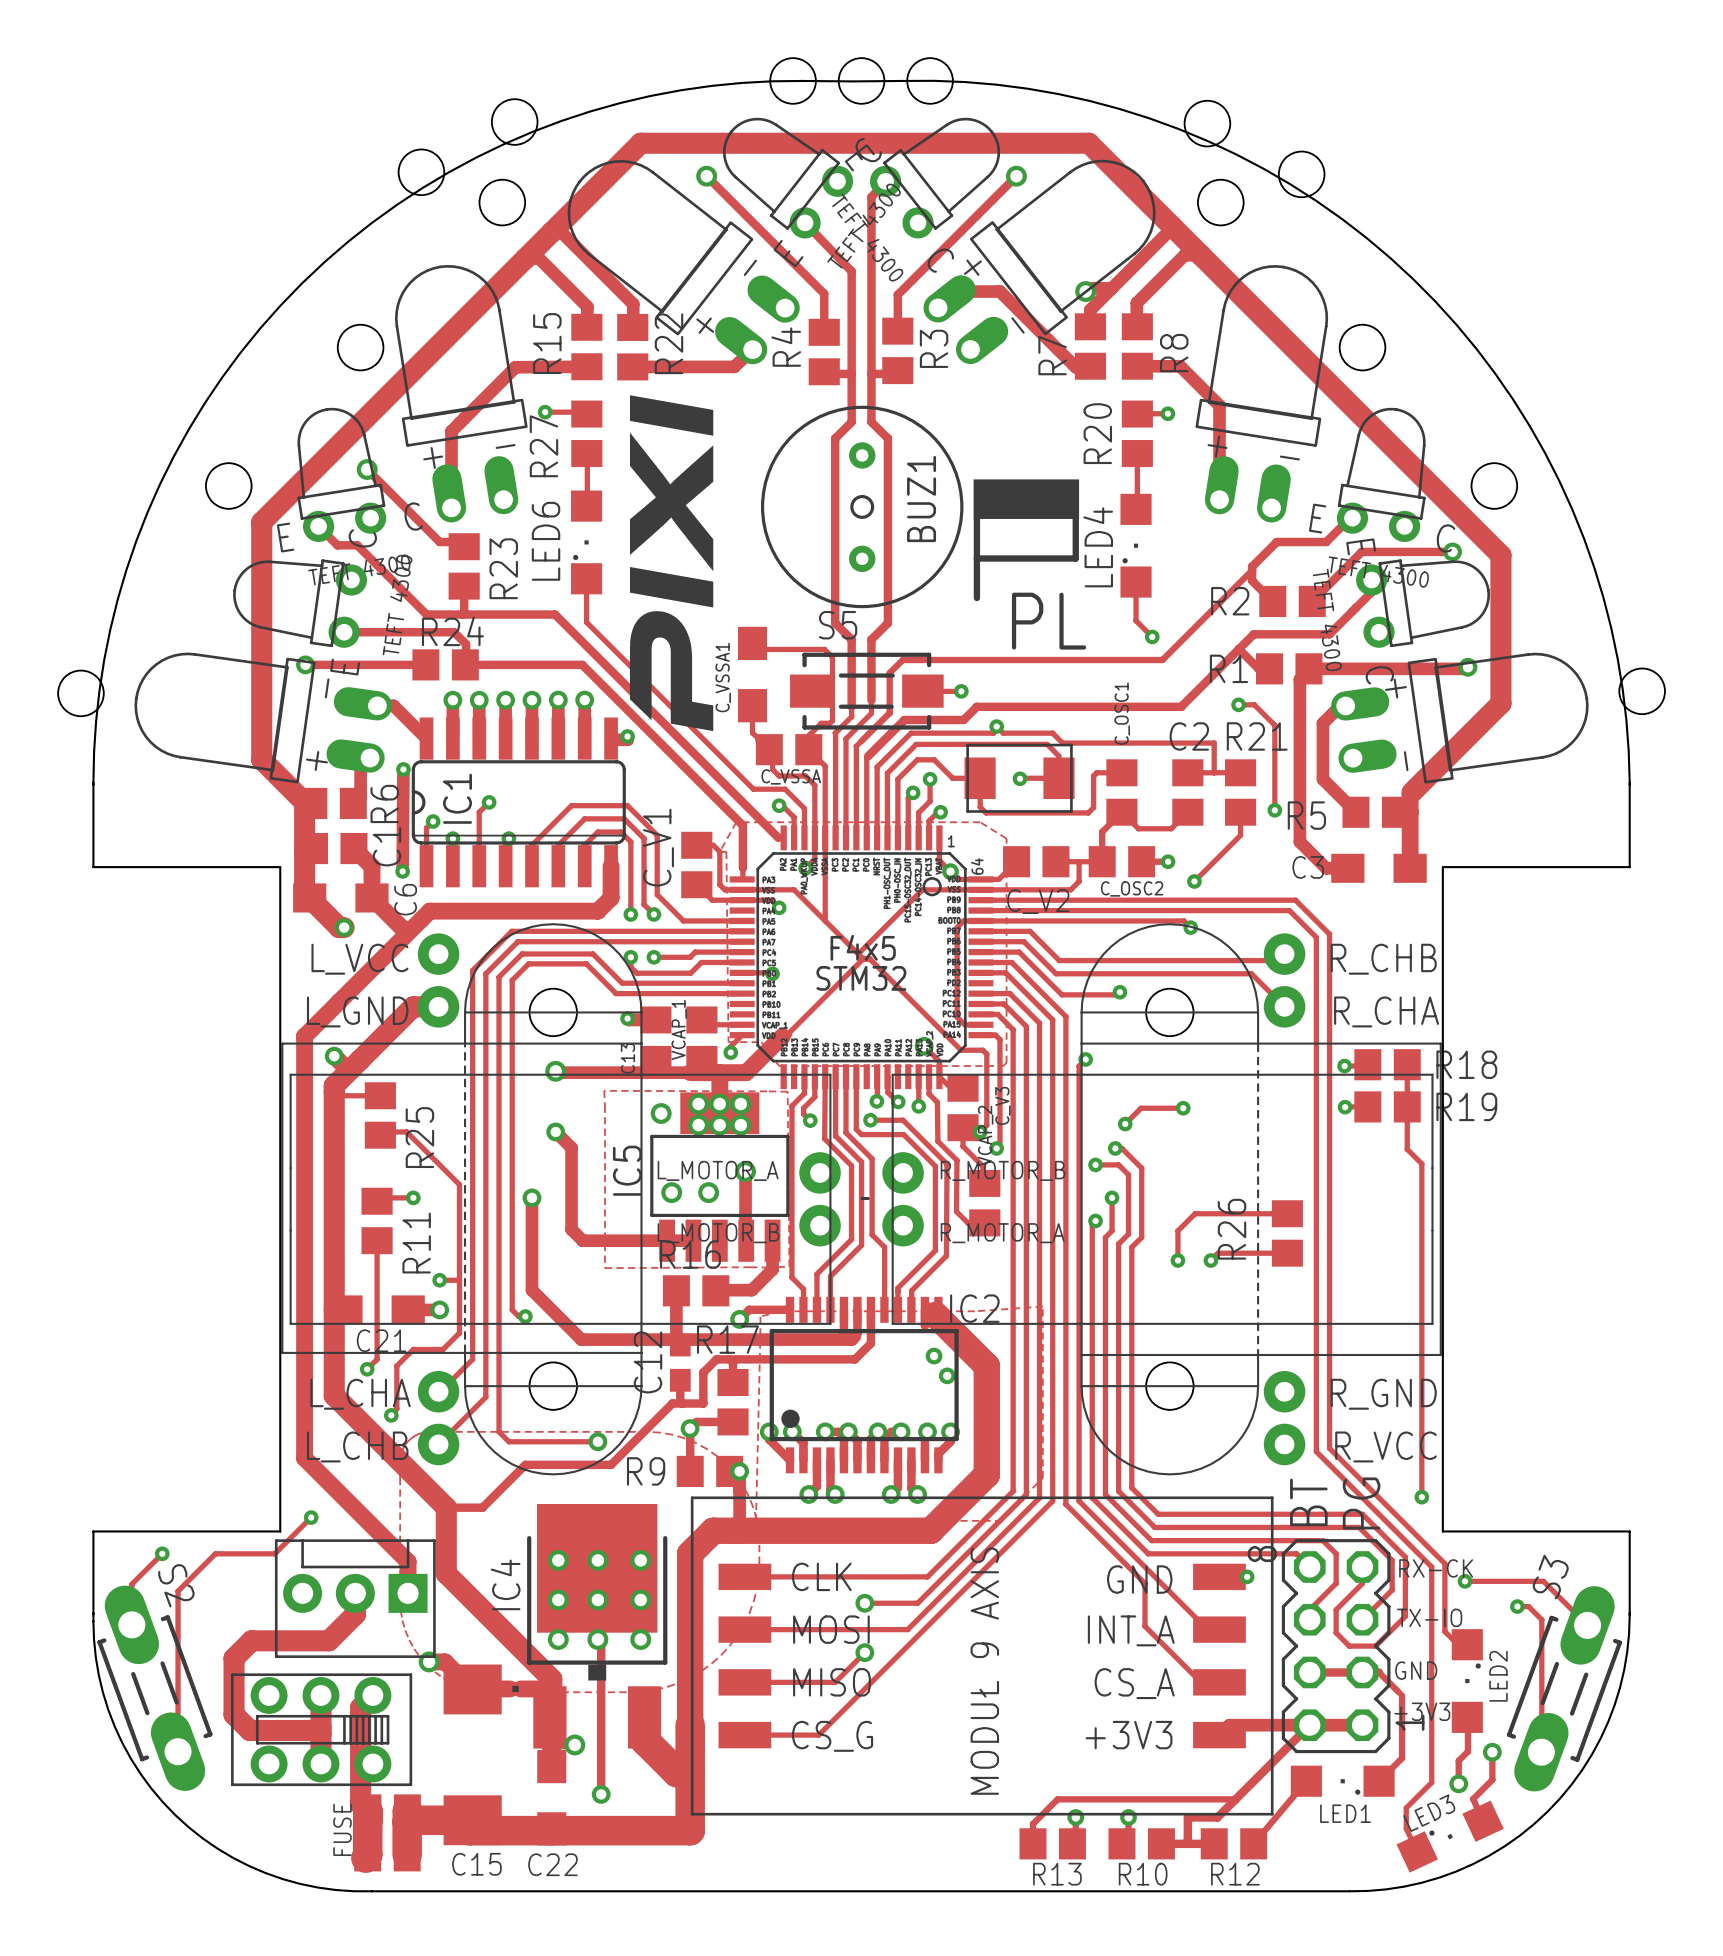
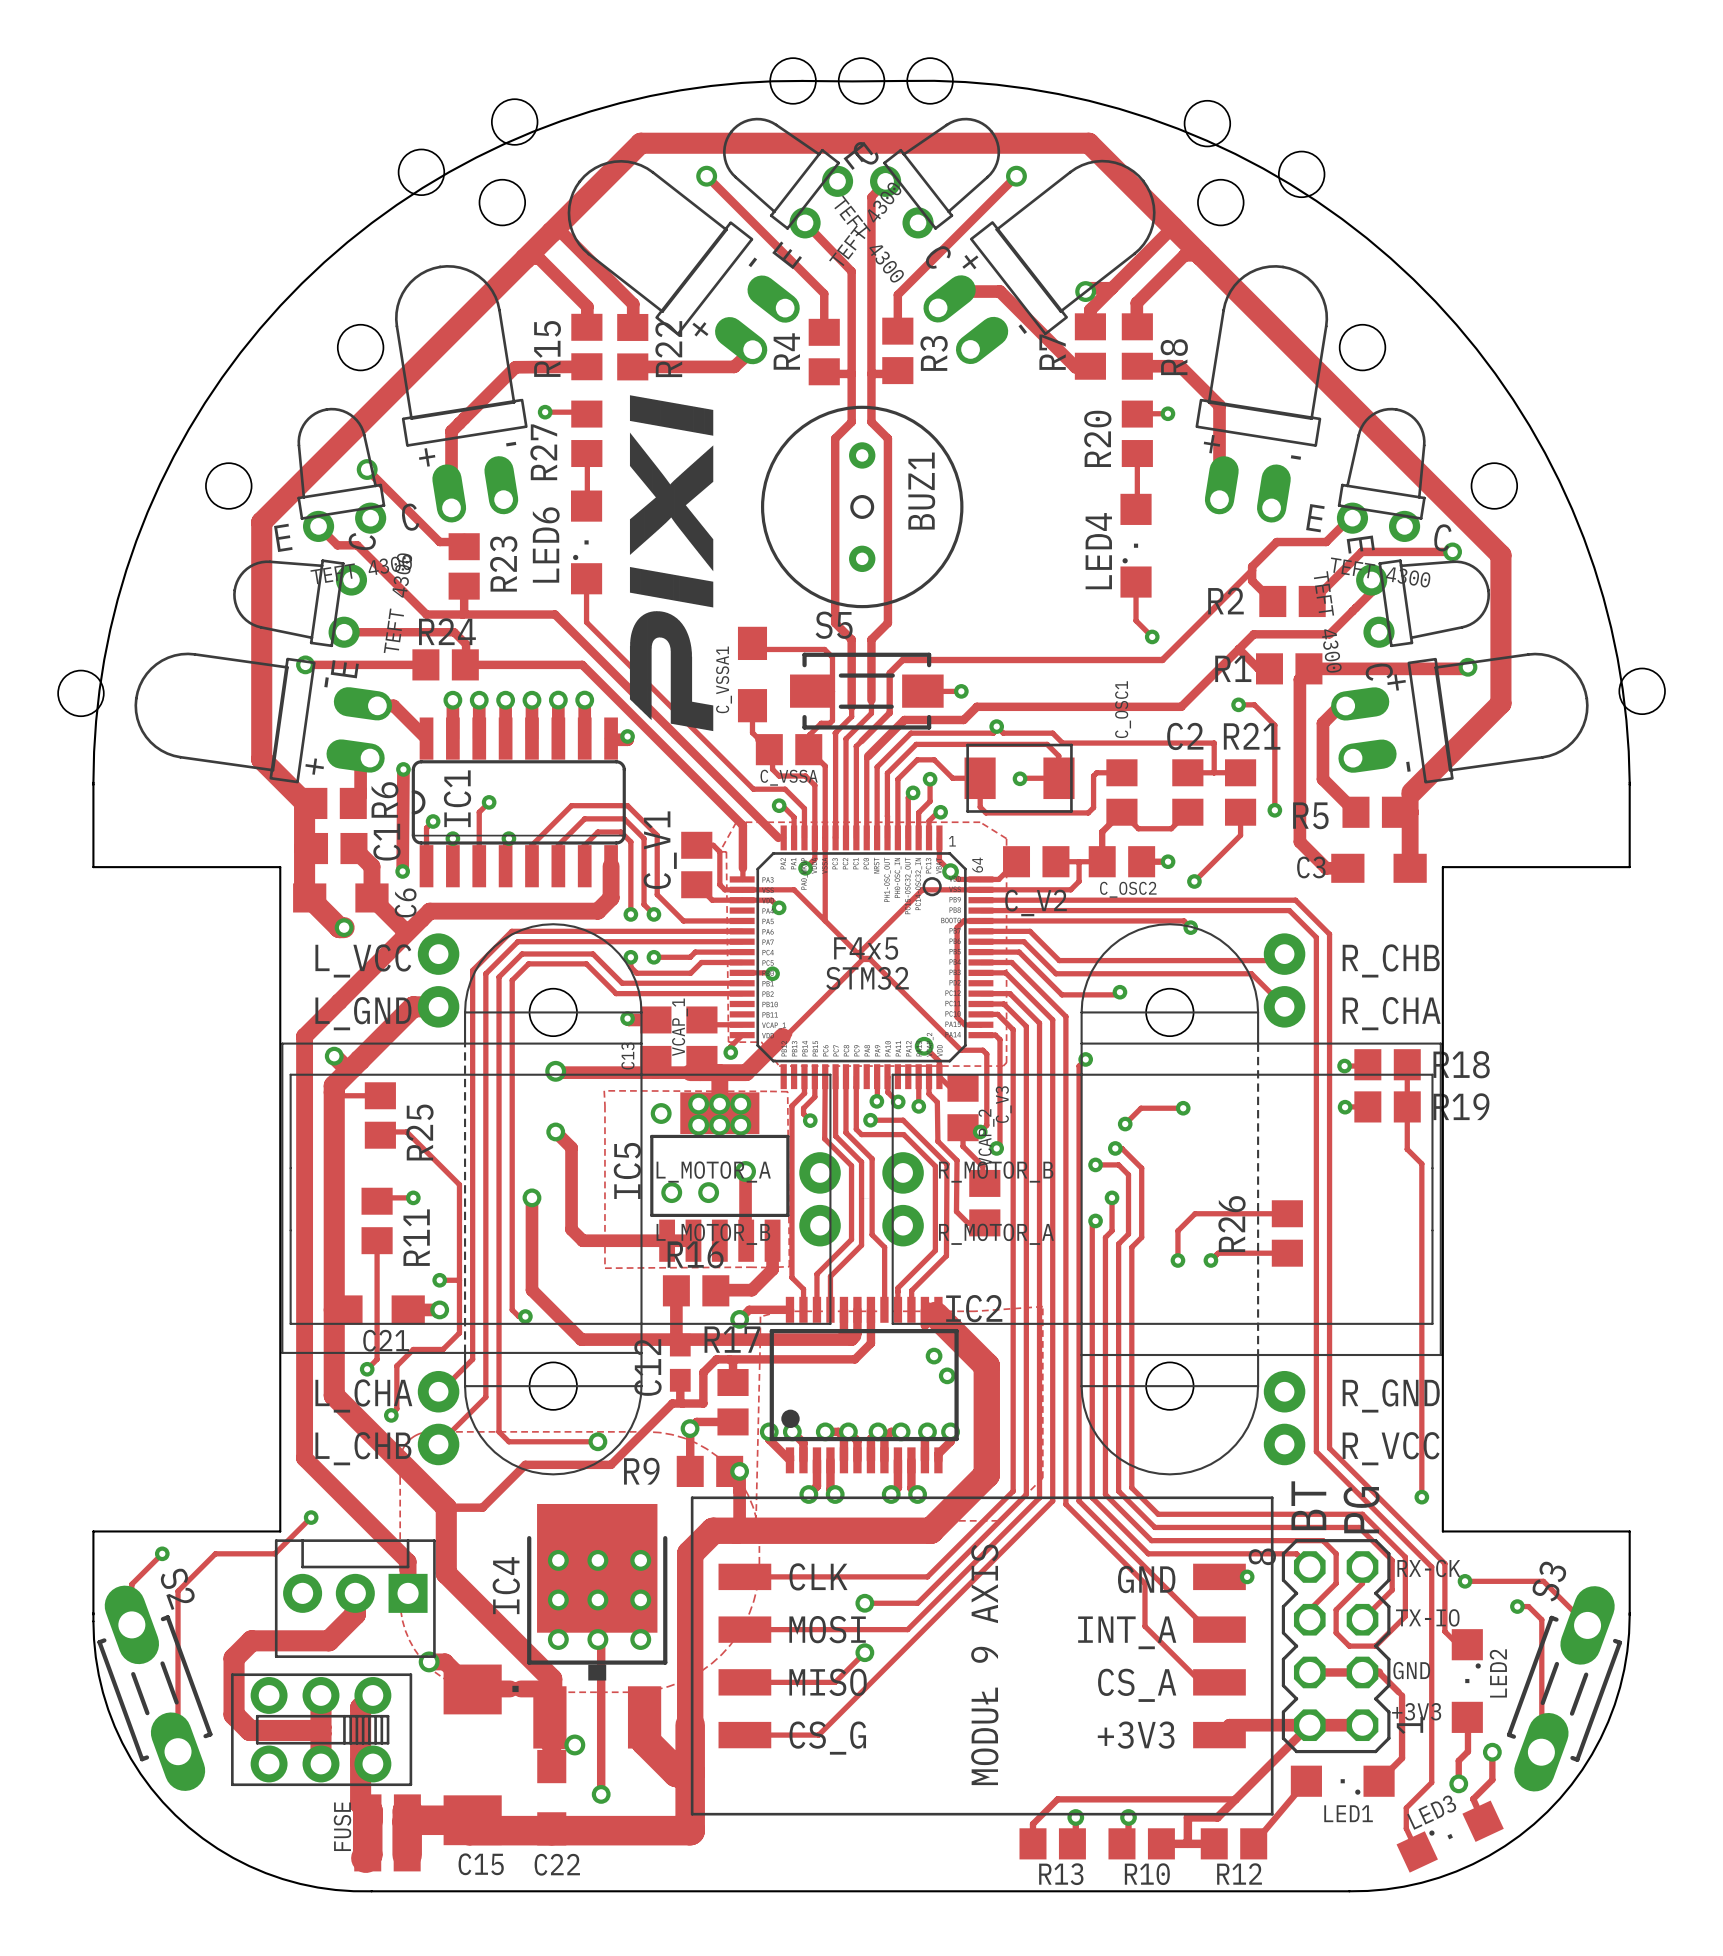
drawing: [973, 479, 1080, 519] -> none
line: (976, 518) (976, 598) -> none
line: (1075, 518) (1075, 558) (976, 558) -> none
text: PL (1049, 621) -> none

